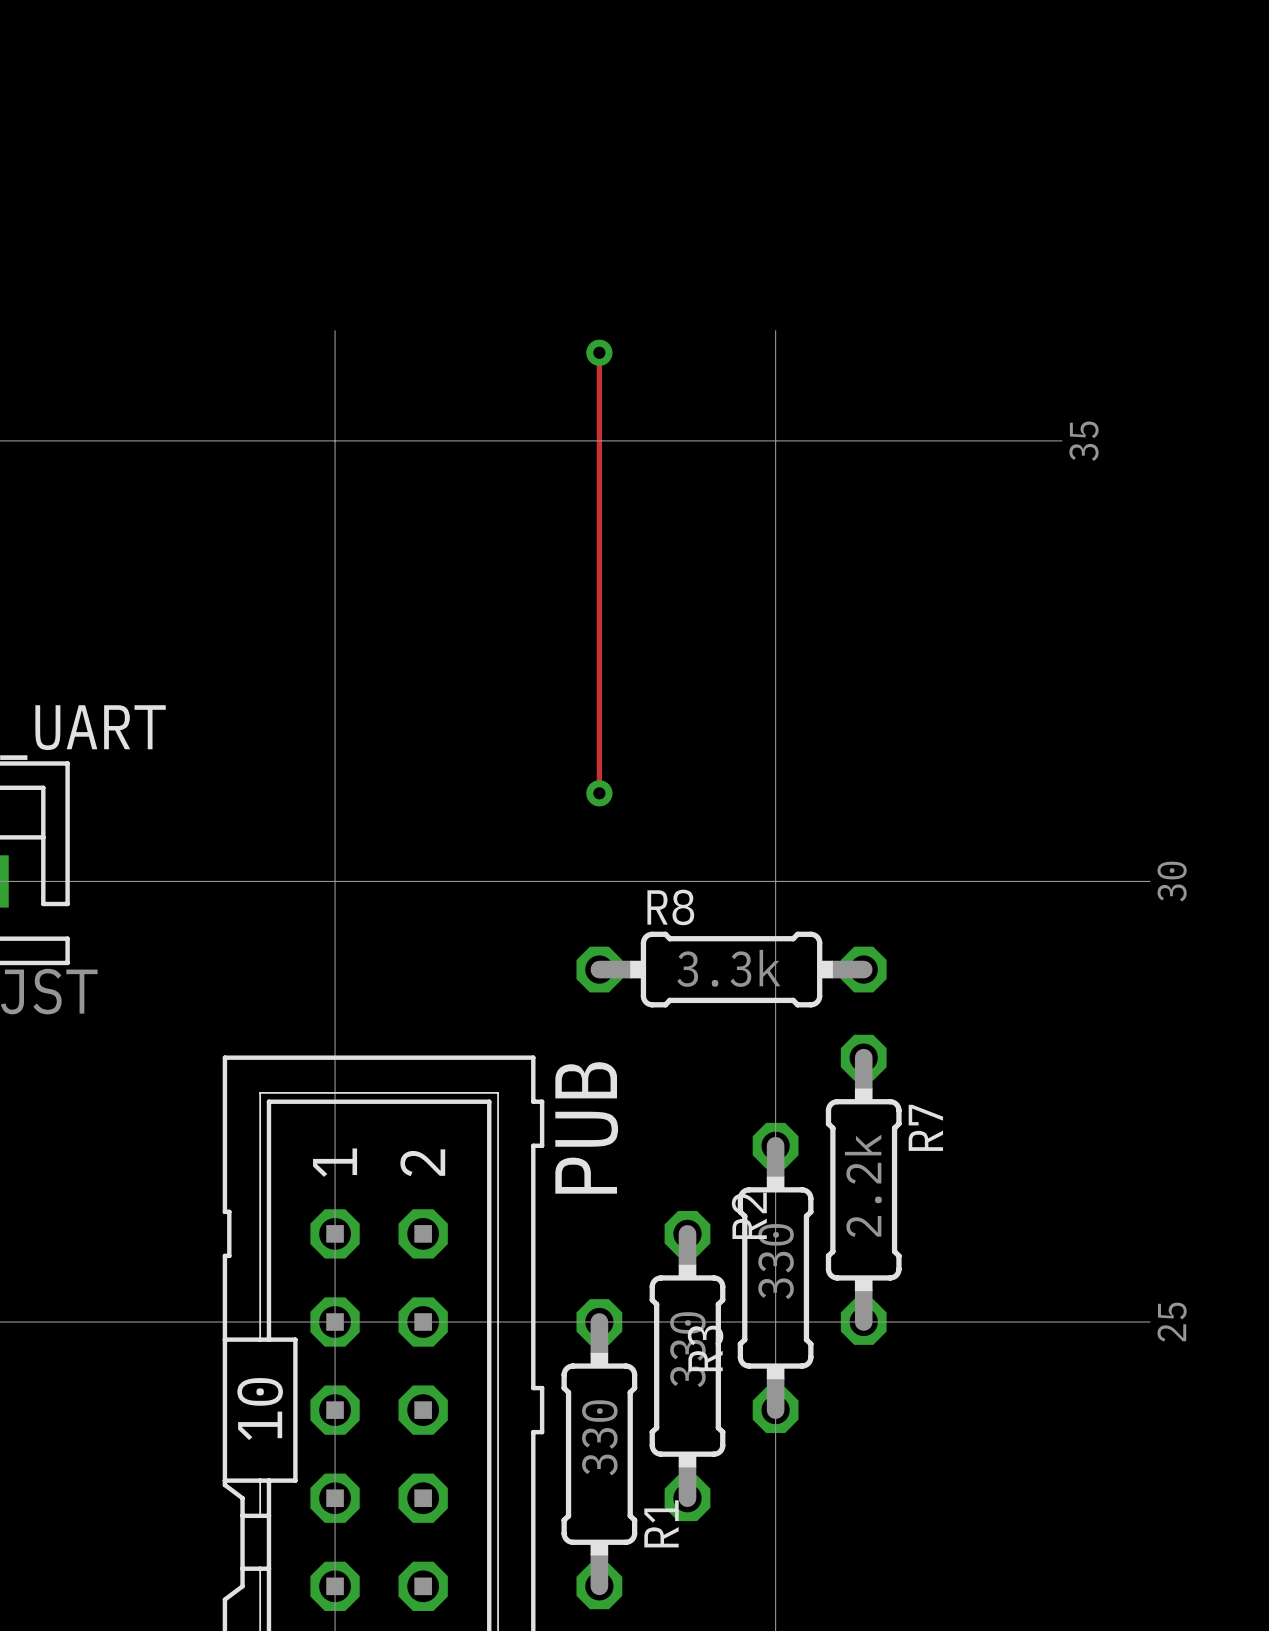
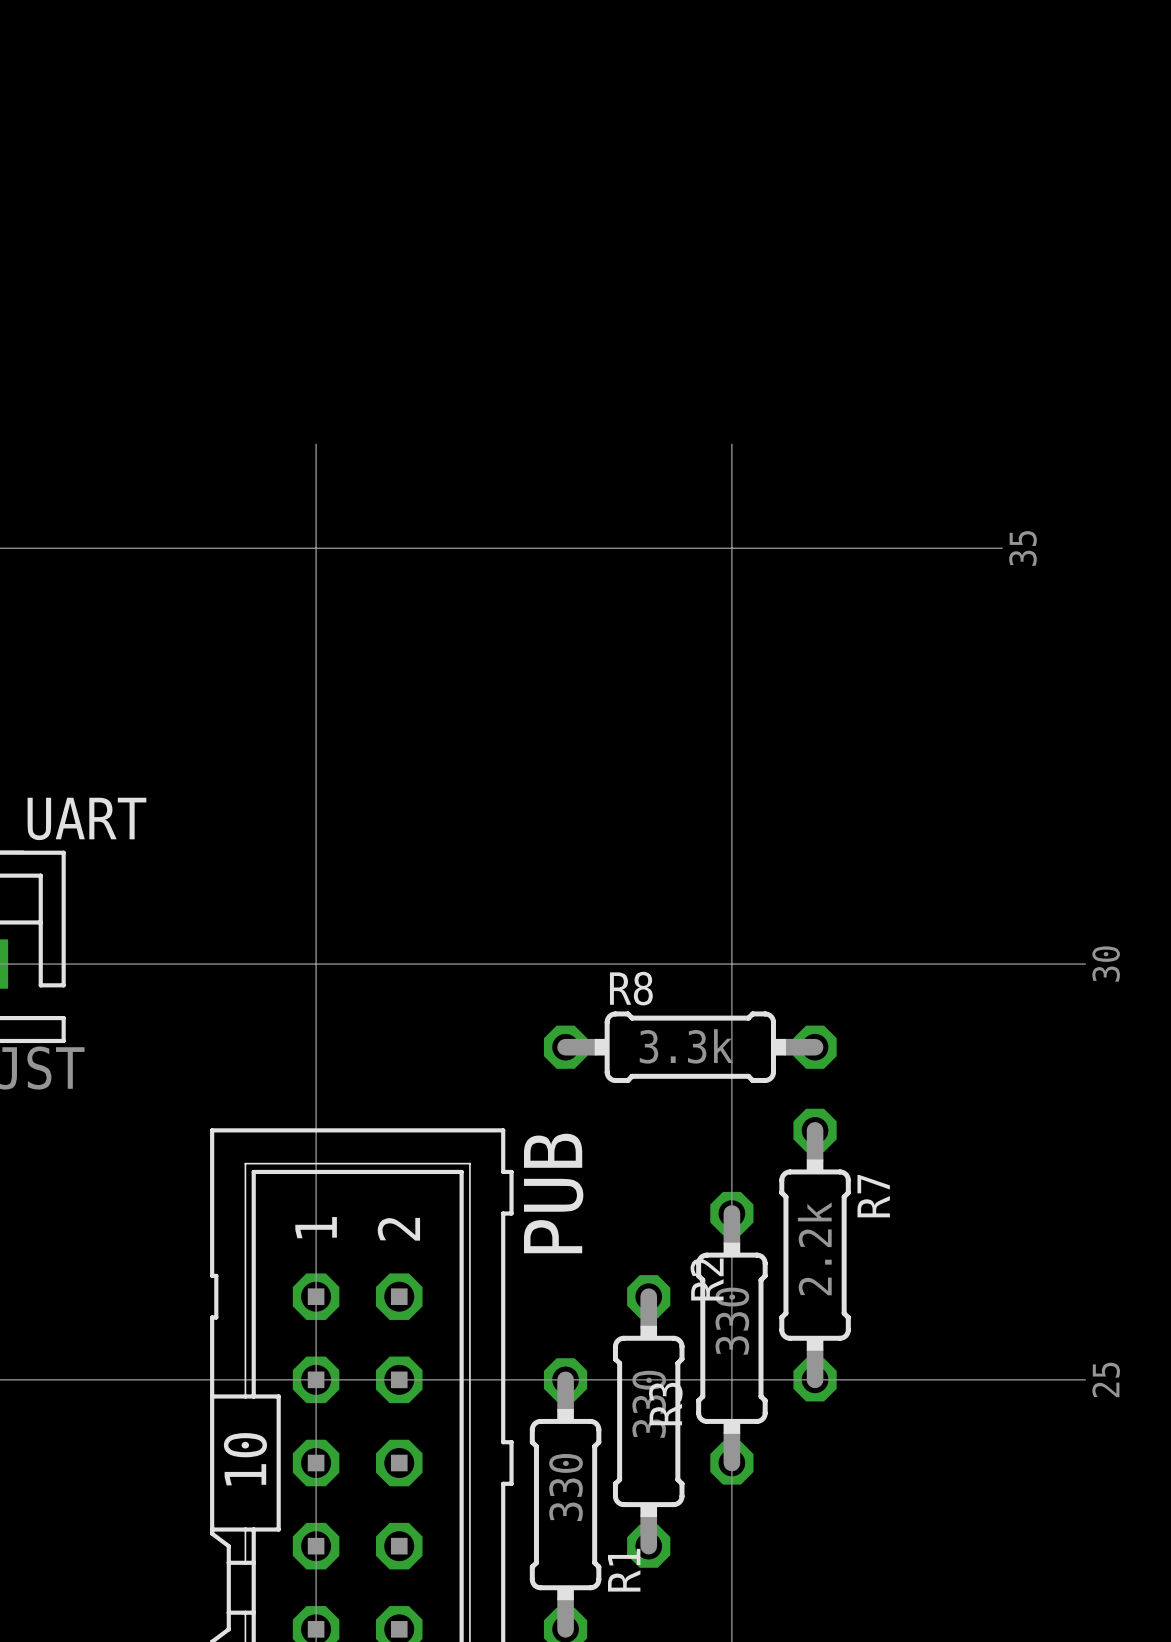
track: (599, 352) (599, 793) -> none
via: (599, 352) -> none
via: (599, 793) -> none

